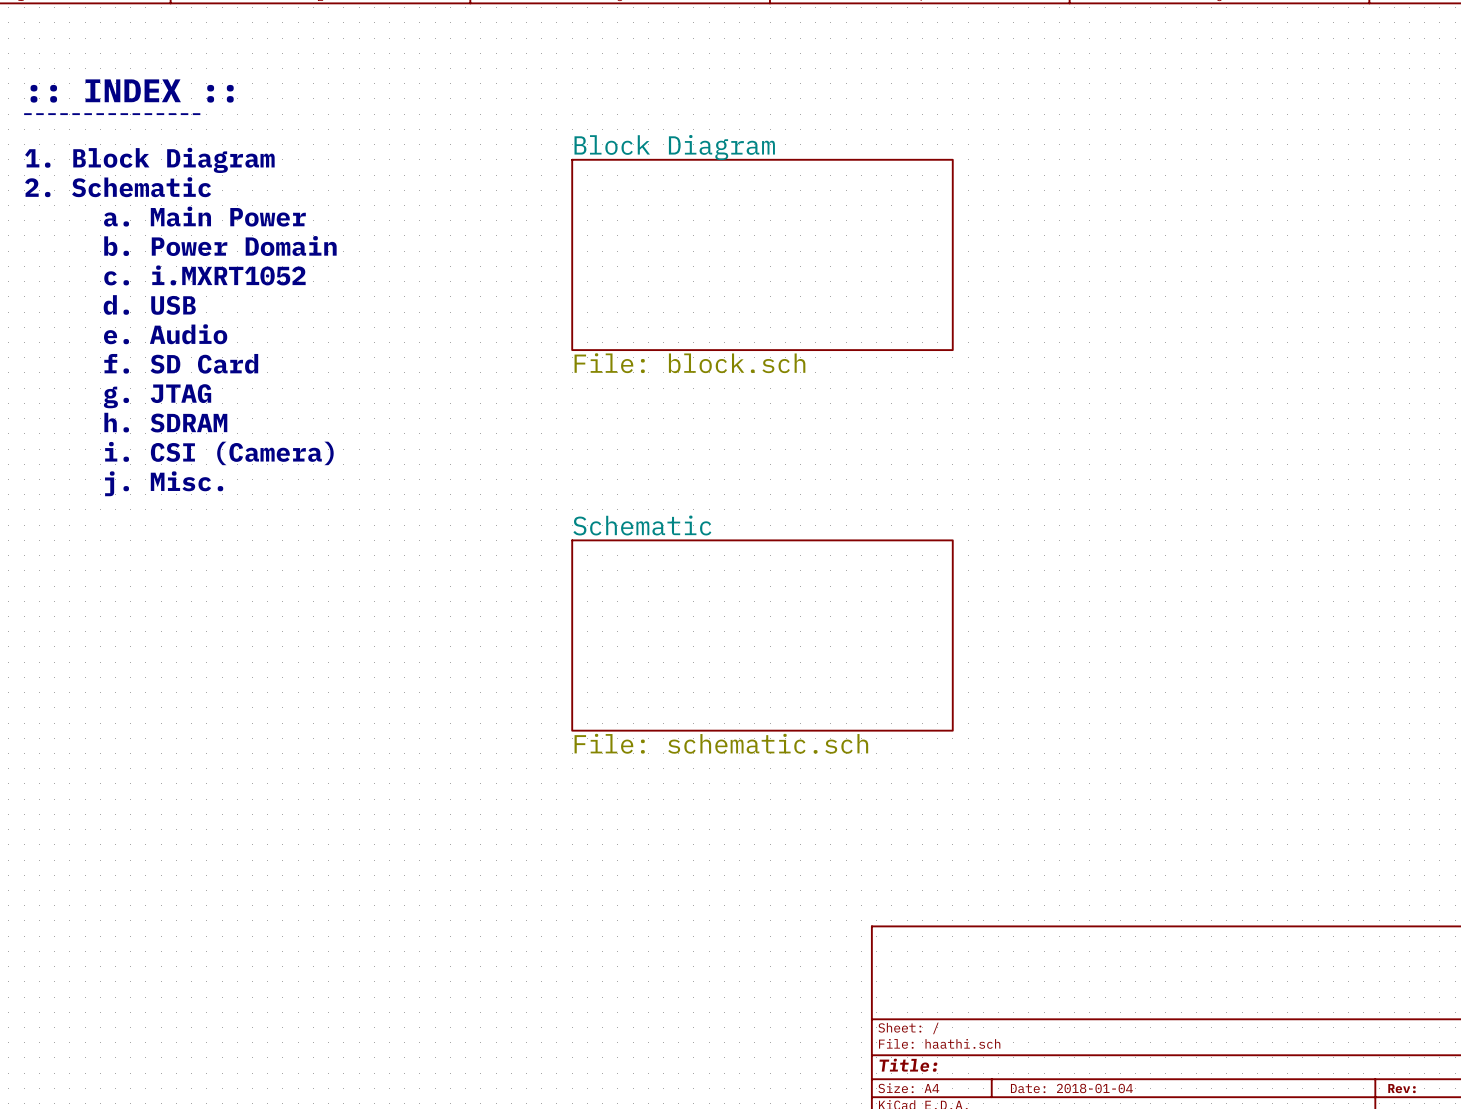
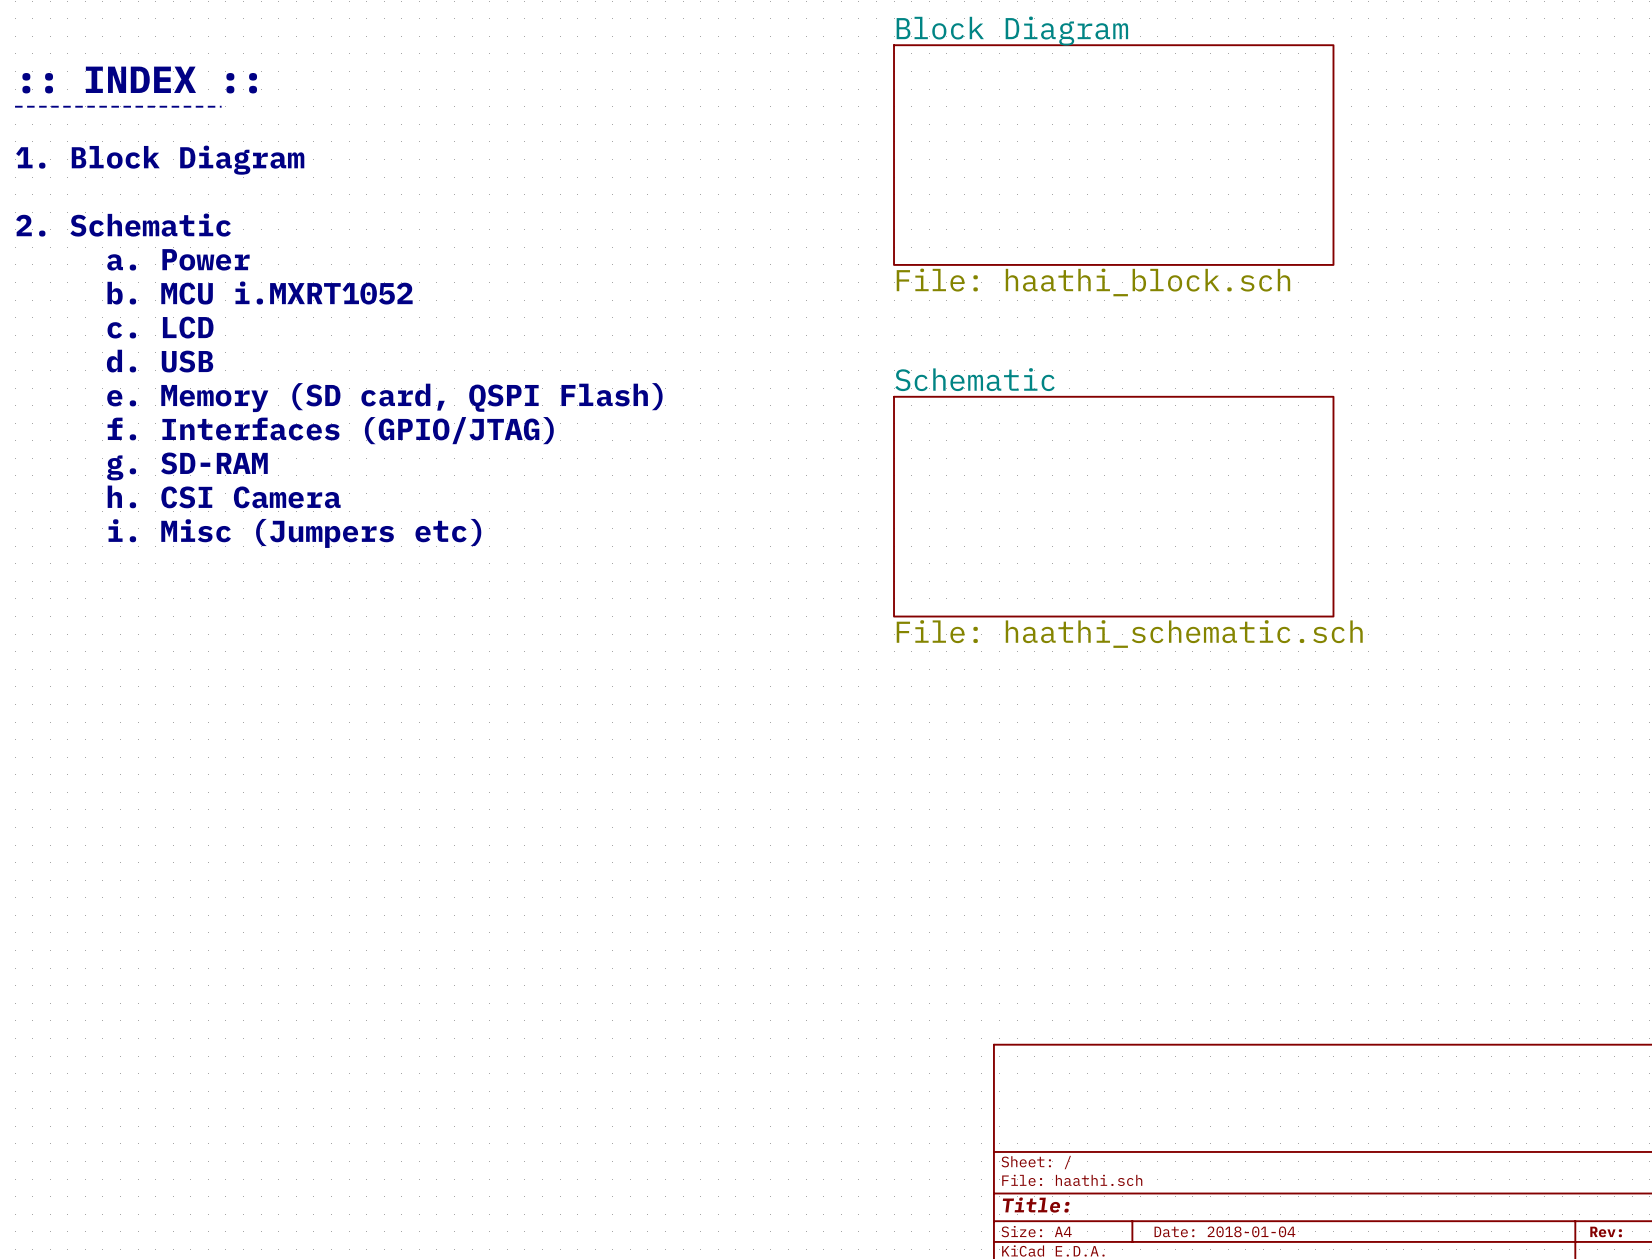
sheet Block Diagram: none -> File: haathi_block.sch (1113, 155)
text: 2. Schematic (118, 187) -> none
text: a. Main Power (204, 216) -> 2. Schematic (123, 225)
text: b. Power Domain (220, 246) -> a. Power (178, 259)
sheet Block Diagram: File: block.sch (762, 254) -> none
text: c. i.MXRT1052 (204, 275) -> b. MCU i.MXRT1052 (260, 292)
text: d. USB (149, 304) -> c. LCD (160, 327)
text: e. Audio (165, 334) -> d. USB (160, 361)
text: f. SD Card (181, 363) -> e. Memory (SD card, QSPI Flash) (384, 397)
text: g. JTAG (157, 396) -> f. Interfaces (GPIO/JTAG) (330, 430)
text: h. SDRAM (165, 422) -> g. SD-RAM (187, 466)
text: i. CSI (Camera) (219, 453) -> h. CSI Camera (224, 496)
sheet Schematic: none -> File: haathi_schematic.sch (1113, 506)
text: j. Misc. (164, 483) -> i. Misc (Jumpers etc) (294, 533)
sheet Schematic: File: schematic.sch (762, 635) -> none

